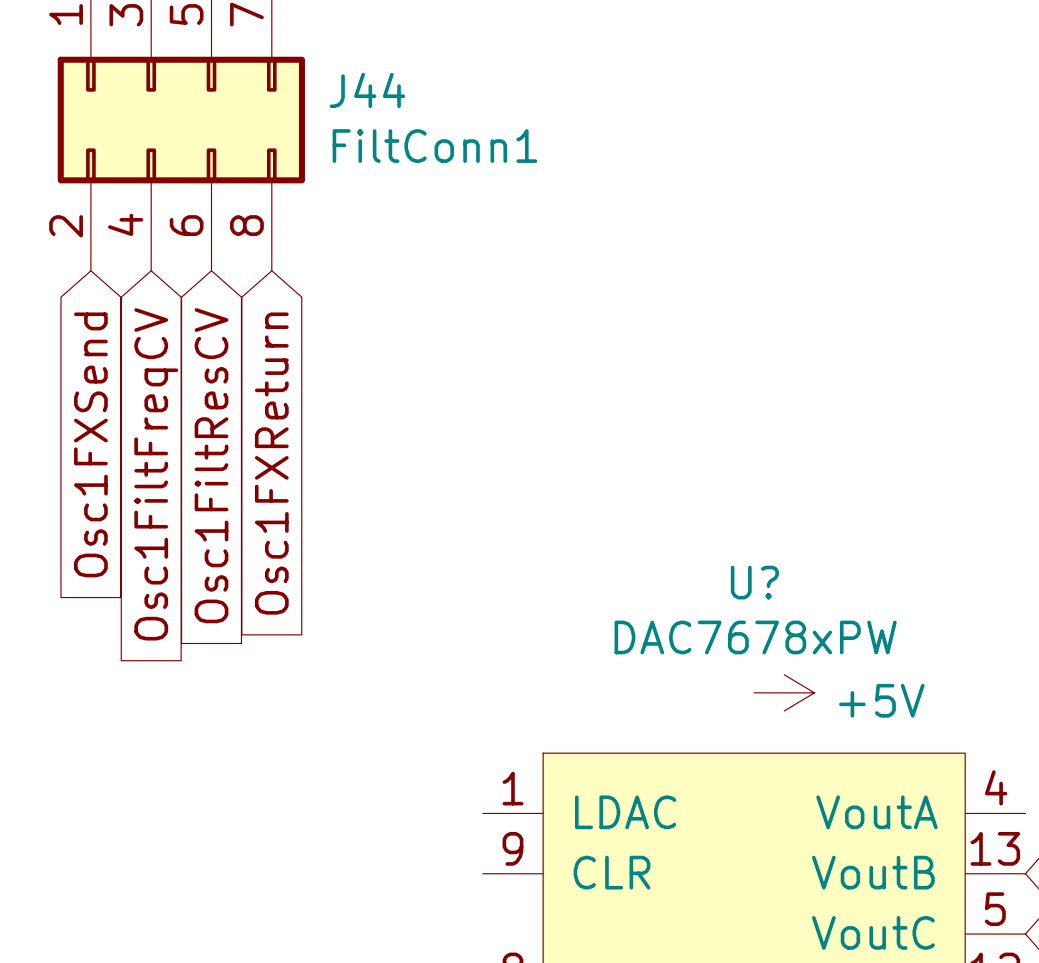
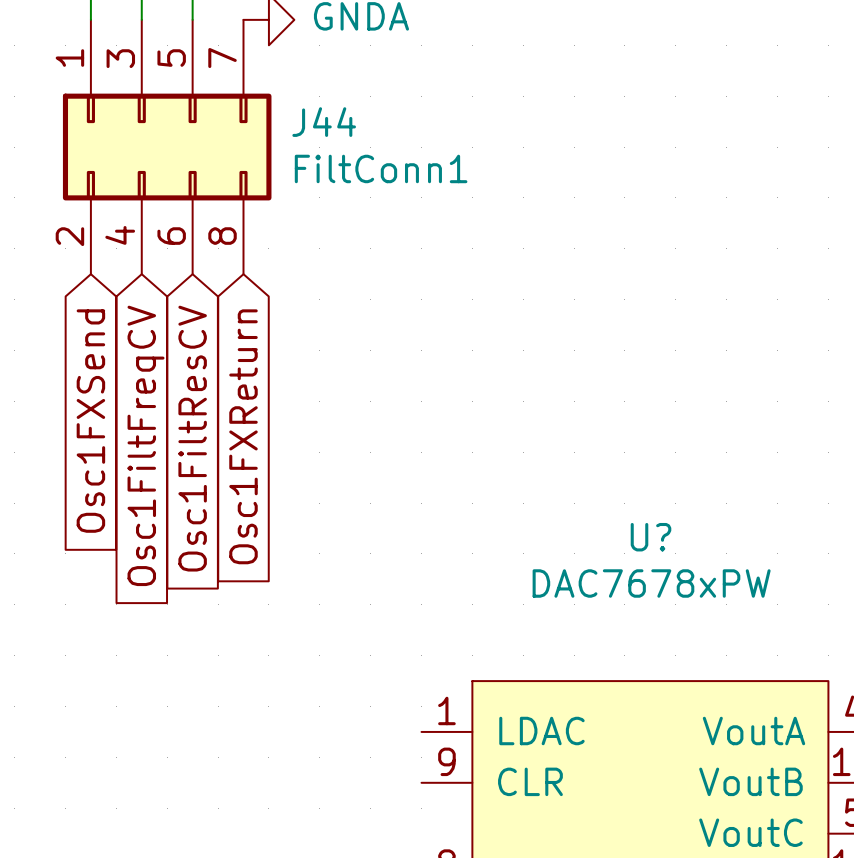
power symbol: +5V (784, 692) -> none

